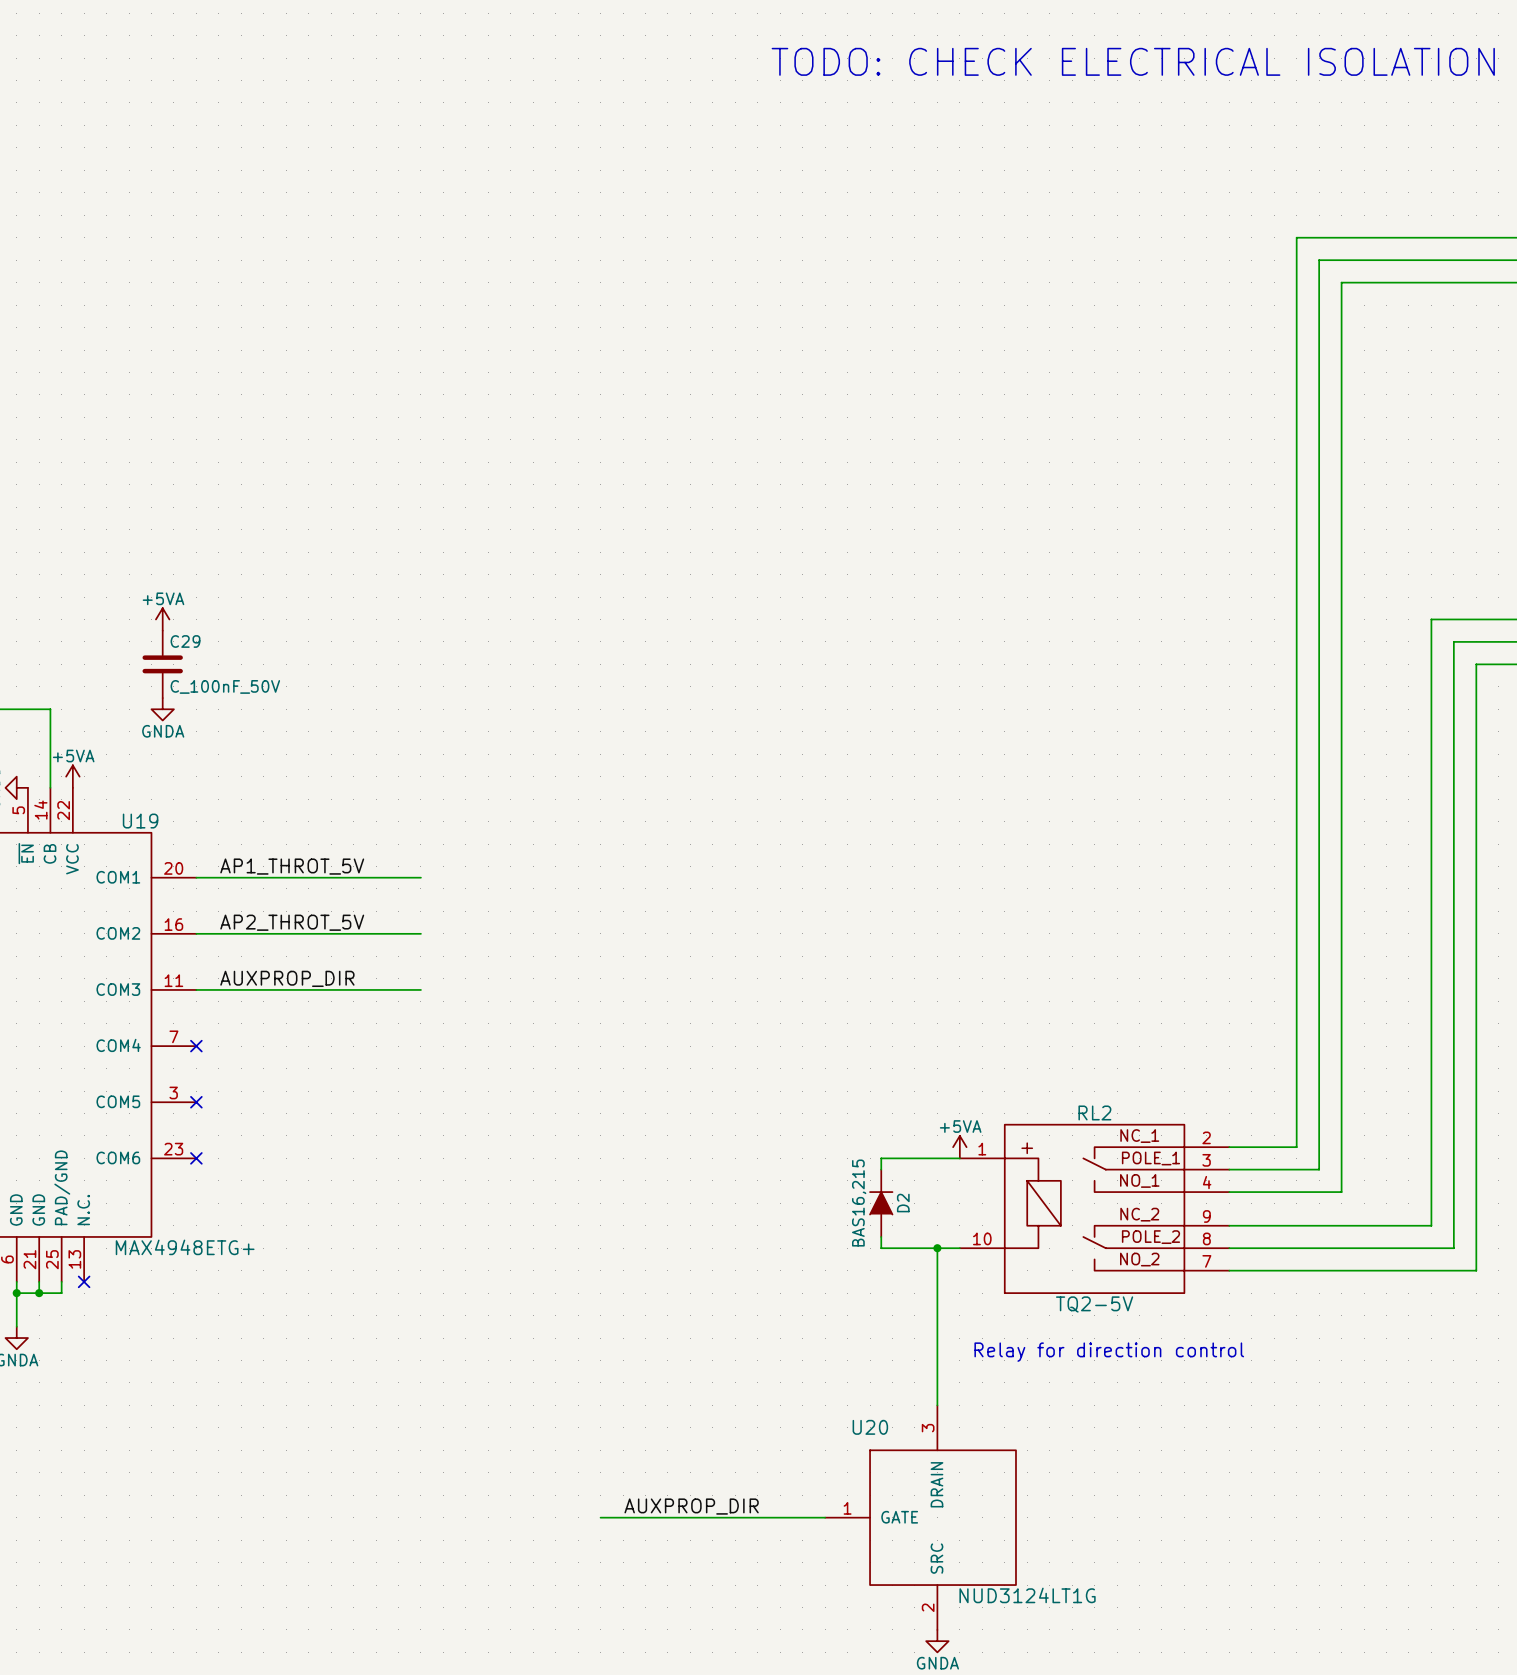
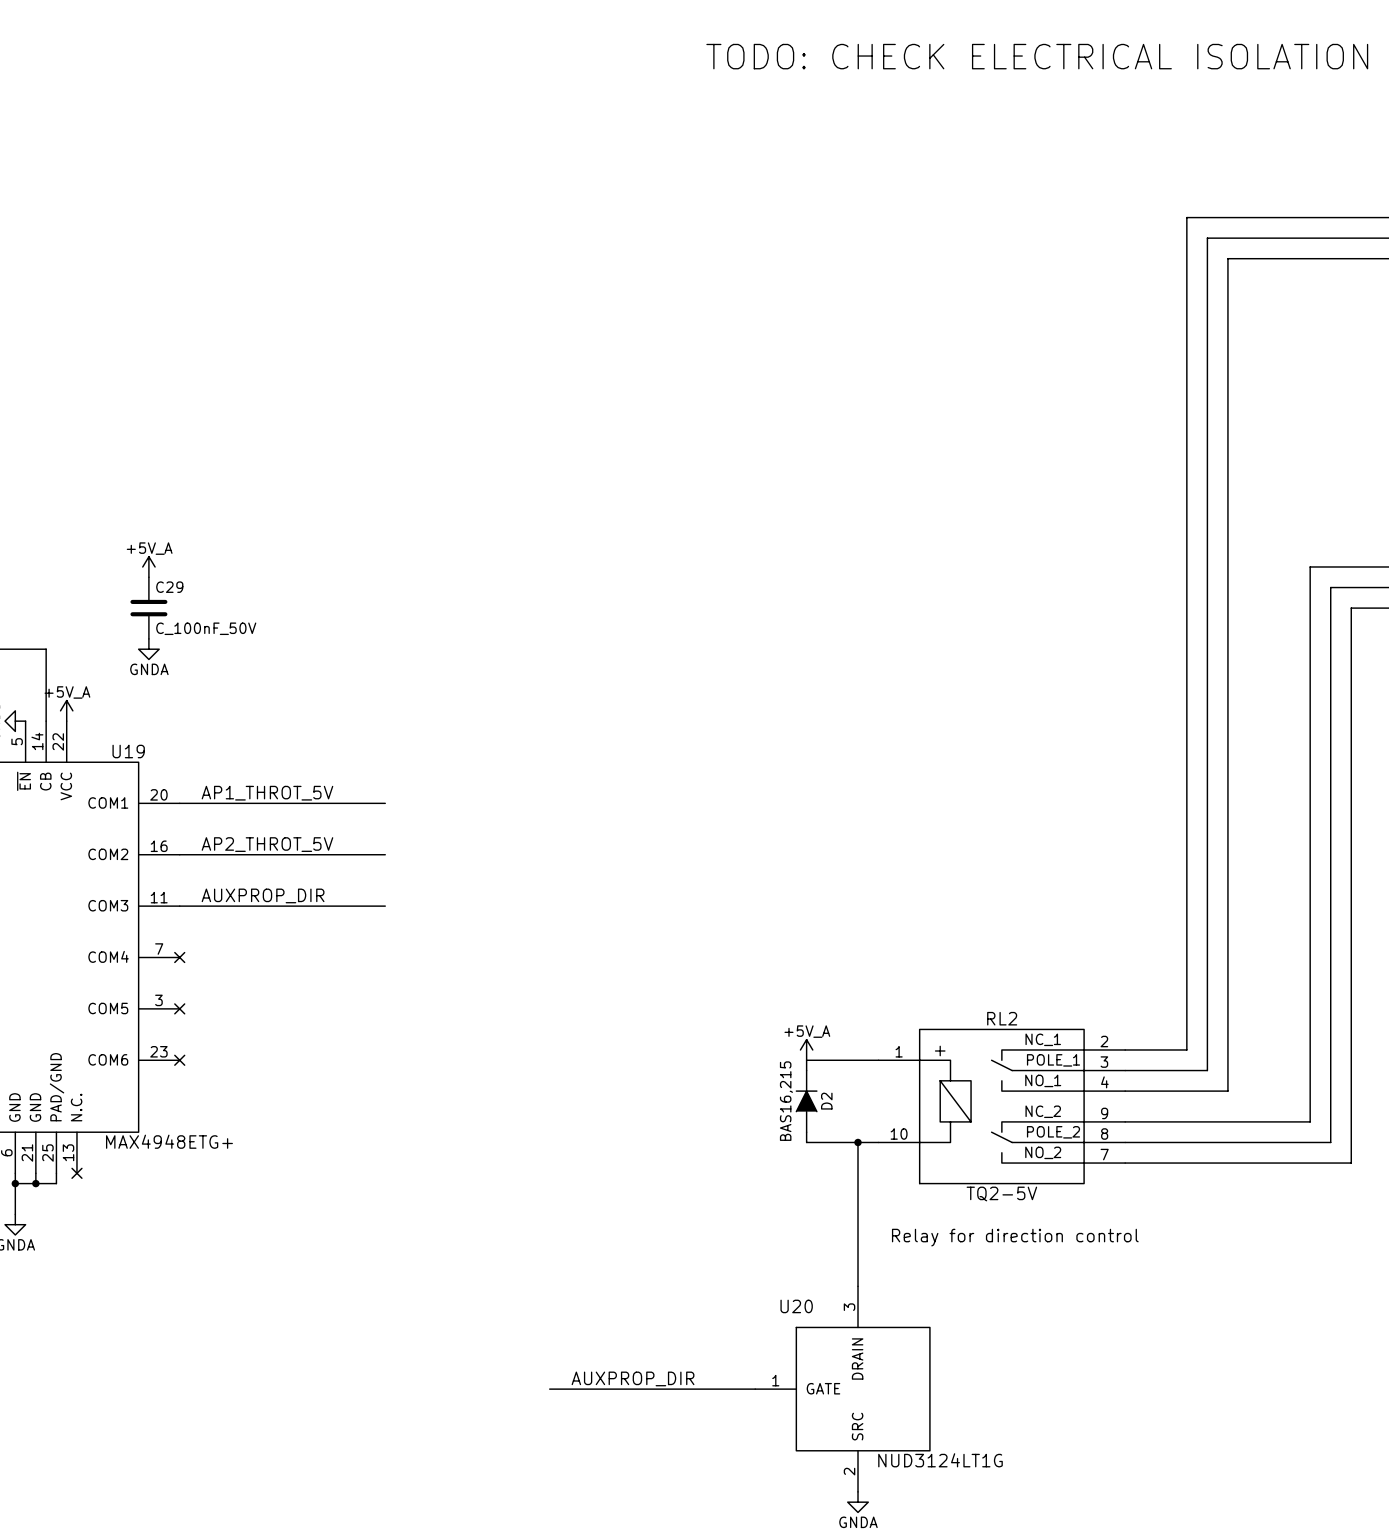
power symbol: +5VA (162, 619) -> +5V_A (148, 566)
power symbol: +5VA (72, 776) -> +5V_A (66, 710)
power symbol: none -> +5V_A (806, 1049)
power symbol: +5VA (959, 1147) -> none

